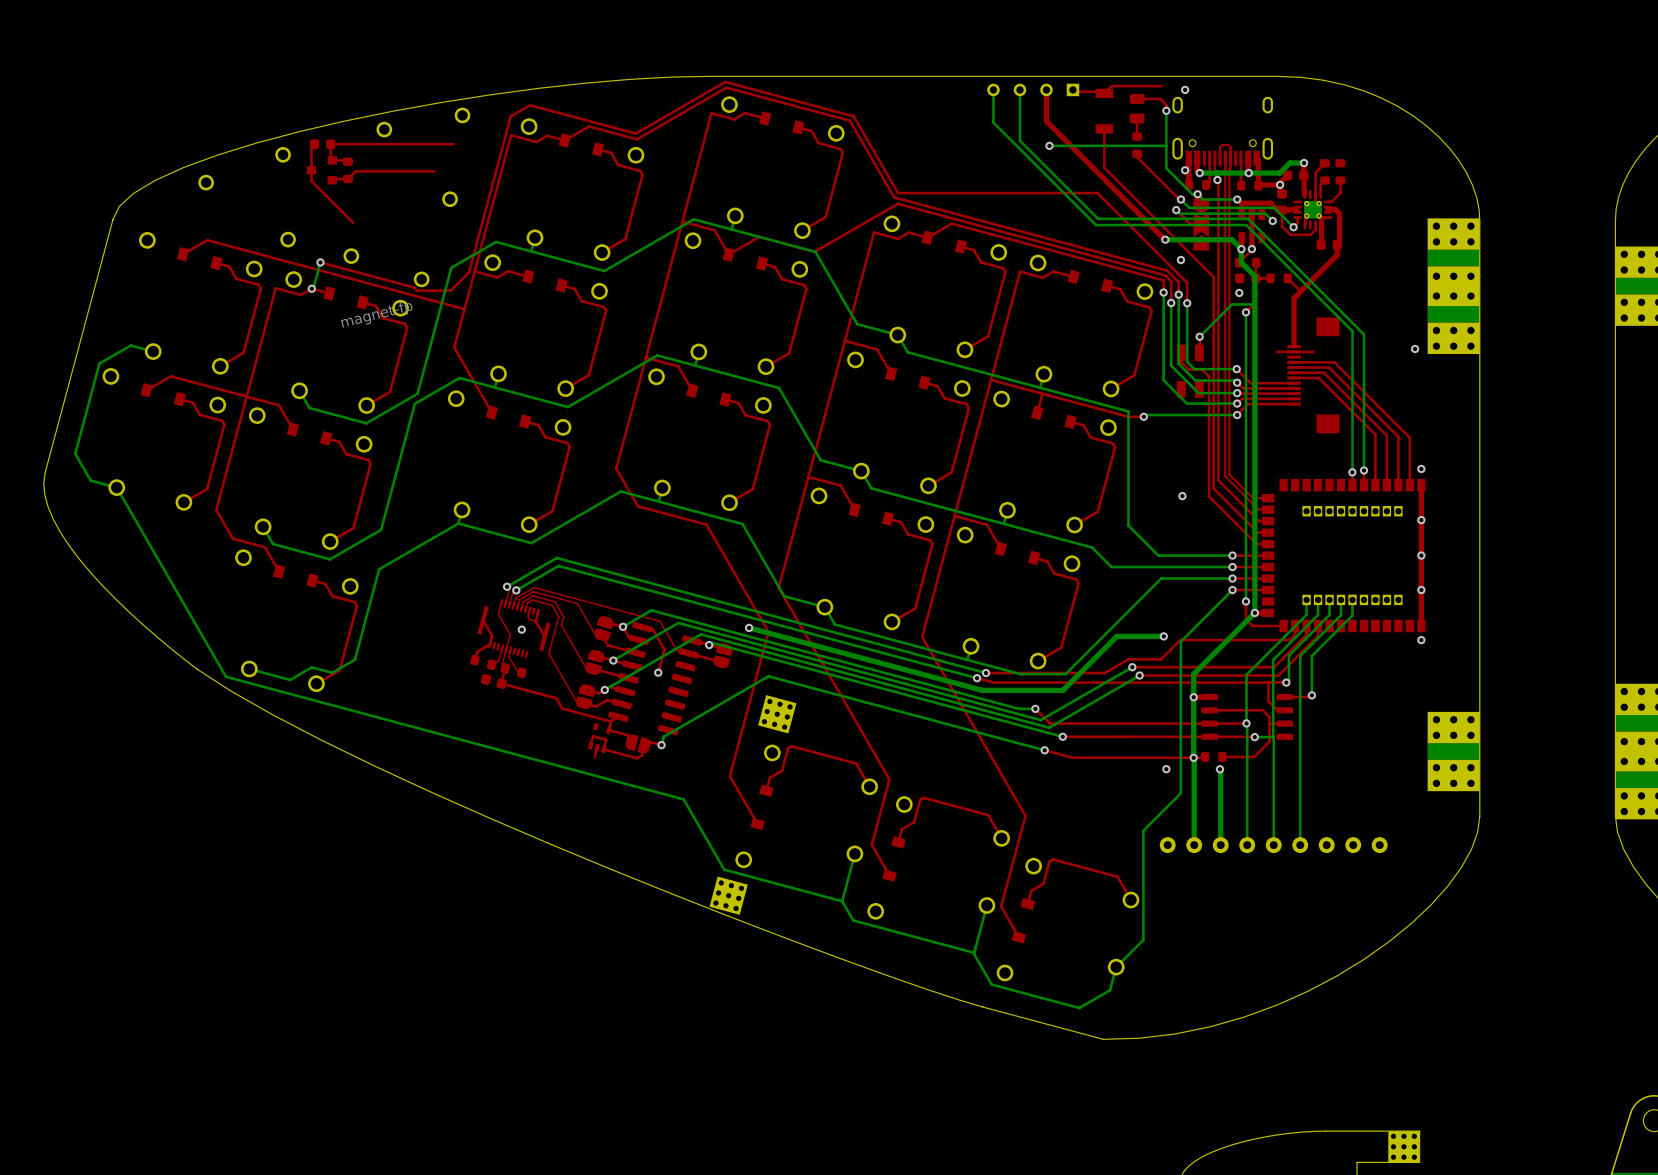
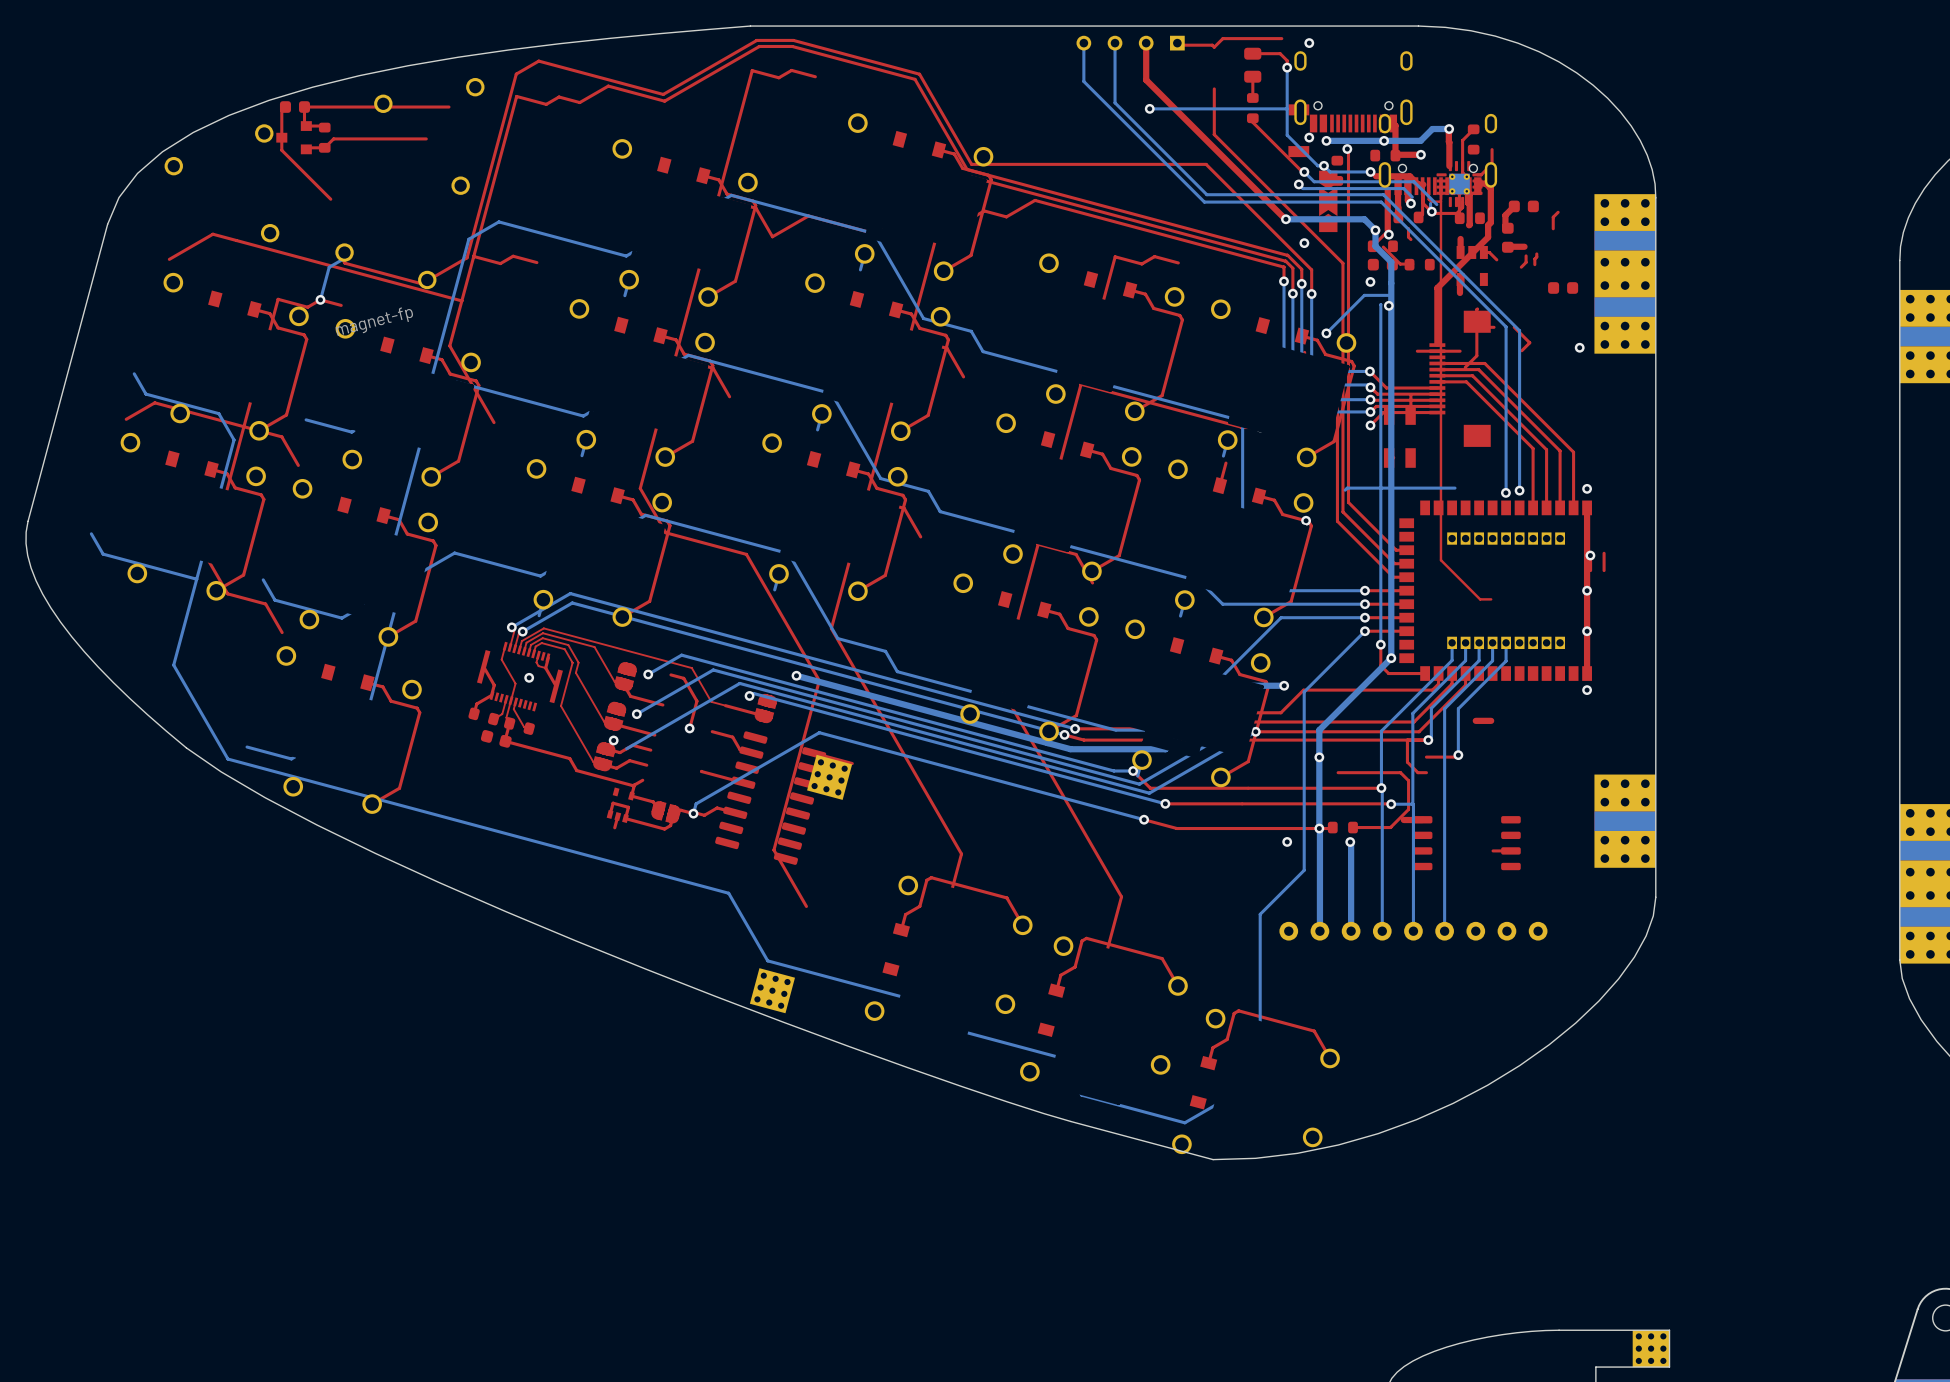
via: none -> (1309, 43)
top track: none -> (759, 46) (792, 46) (915, 79) (967, 169) (1287, 255) (1301, 269) (1301, 283)
top track: none -> (759, 46) (664, 101) (608, 86) (579, 102) (559, 97) (546, 104) (516, 96) (449, 345) (494, 422)
via: none -> (1287, 67)
top track: none -> (1214, 88) (1214, 134) (1342, 263) (1342, 511) (1394, 563) (1406, 563)
board edge: (1278, 76) (709, 76) (630, 79) (489, 94) (391, 111) (298, 131) (217, 154) (155, 180) (133, 193) (119, 206) (112, 219) (45, 472) (43, 483) (48, 506) (69, 545) (103, 586) (143, 624) (196, 668) (230, 690) (319, 739) (429, 791) (551, 844) (733, 918) (887, 975) (982, 1006) (1103, 1039) (1139, 1038) (1175, 1033) (1243, 1017) (1276, 1005) (1336, 976) (1364, 959) (1411, 923) (1431, 904) (1461, 867) (1471, 849) (1477, 832) (1479, 816) (1479, 221) (1476, 197) (1466, 172) (1449, 148) (1426, 125) (1397, 106) (1362, 90) (1343, 84) (1300, 77) (1278, 76) -> (1418, 26) (1445, 27) (1495, 36) (1517, 43) (1558, 61) (1593, 85) (1620, 111) (1640, 140) (1652, 169) (1655, 197) (1655, 897) (1653, 915) (1646, 935) (1634, 957) (1598, 1001) (1575, 1023) (1519, 1065) (1487, 1085) (1416, 1119) (1338, 1144) (1297, 1153) (1255, 1158) (1213, 1159) (1070, 1121) (1007, 1101) (847, 1046) (715, 996) (575, 940) (438, 882) (317, 825) (221, 771) (186, 747) (166, 731) (98, 667) (60, 622) (36, 580) (27, 555) (26, 543) (28, 521) (107, 224) (118, 197) (137, 173) (162, 151) (193, 132) (229, 115) (312, 87) (408, 65) (560, 43) (750, 26) (1418, 26)
part: none -> (1353, 91)
top track: (1161, 86) (1111, 86) (1104, 93) (1102, 91) (1073, 91) -> (1281, 38) (1222, 38) (1214, 47) (1212, 45) (1177, 45)
bottom track: (993, 89) (993, 122) (1095, 225) (1246, 225) (1352, 331) (1352, 472) -> (1083, 43) (1083, 81) (1204, 202) (1381, 202) (1506, 326) (1505, 492)
bottom track: (1019, 89) (1019, 140) (1098, 218) (1248, 218) (1363, 334) (1363, 470) -> (1115, 43) (1115, 102) (1206, 194) (1383, 194) (1519, 330) (1519, 490)
part position: (1033, 89) -> (1130, 43)
top track: (1046, 89) (1046, 121) (1165, 239) -> (1146, 43) (1146, 80) (1285, 219)
via: (1185, 89) -> none
part: none -> (1252, 108)
via: none -> (1149, 108)
top track: (1137, 98) (1160, 98) (1166, 104) (1166, 110) -> (1252, 53) (1280, 53) (1287, 60) (1287, 67)
part position: (1137, 108) -> (1252, 65)
via: none -> (1449, 129)
bottom track: (1166, 110) (1166, 168) (1192, 194) (1197, 194) (1202, 199) (1237, 199) -> (1287, 67) (1287, 135) (1317, 165) (1324, 165) (1330, 171) (1370, 171)
via: (1166, 110) -> none
via: none -> (1309, 137)
top track: (765, 118) (745, 113) (734, 119) (711, 113) (616, 468) (638, 506) (706, 524) (768, 632) (729, 776) (757, 824) -> (815, 76) (791, 70) (778, 77) (752, 70) (640, 488) (665, 532) (746, 554) (819, 680) (773, 850) (806, 906)
top track: (1137, 118) (1137, 136) -> (1252, 76) (1252, 97)
part: none -> (1473, 139)
via: none -> (1326, 140)
via: none -> (1384, 140)
via: none -> (1347, 149)
top track: (1104, 128) (1104, 167) -> none
via: none -> (1420, 154)
part: none -> (1385, 155)
via: none -> (1324, 165)
top track: (314, 144) (311, 147) (311, 181) (353, 222) -> (285, 107) (281, 110) (281, 150) (330, 199)
part position: (322, 144) -> (294, 107)
top track: (453, 144) (330, 144) (330, 158) (347, 161) -> (448, 107) (304, 107) (304, 124) (306, 126) (324, 127)
via: (1049, 145) -> none
bottom track: (1166, 145) (1049, 145) -> (1287, 108) (1149, 108)
via: none -> (1304, 171)
via: none -> (1370, 171)
top track: (1137, 153) (1137, 157) (1180, 199) -> (1252, 118) (1252, 122) (1304, 171)
via: none -> (1298, 184)
top track: (1220, 158) (1220, 147) (1222, 144) (1228, 144) (1230, 147) (1229, 173) -> none
top track: (1256, 158) (1258, 160) (1258, 185) (1280, 184) -> (1393, 123) (1395, 125) (1395, 155) (1420, 154)
top track: (1304, 162) (1304, 194) -> (1449, 129) (1449, 166)
bottom track: (1304, 162) (1289, 162) (1279, 173) (1199, 173) -> (1449, 129) (1432, 129) (1420, 140) (1326, 140)
via: (1304, 162) -> none
top track: (1324, 163) (1315, 172) (1315, 200) (1319, 203) -> (1473, 129) (1462, 140) (1462, 172) (1466, 176)
top track: (1104, 167) (1213, 277) (1213, 488) (1257, 532) (1267, 532) -> none
part position: (321, 170) -> (294, 137)
part position: (347, 170) -> (324, 137)
via: (1185, 170) -> none
top track: (434, 171) (355, 171) (347, 178) (332, 180) -> (426, 138) (333, 138) (324, 147) (306, 149)
part: none -> (1328, 201)
part: (1324, 171) -> none
part: (1340, 171) -> none
top track: (1229, 173) (1229, 474) (1253, 498) (1267, 498) -> none
via: (1248, 173) -> none
top track: (1217, 179) (1218, 480) (1259, 521) (1267, 521) -> (1347, 149) (1348, 502) (1396, 550) (1406, 550)
top track: (1340, 180) (1340, 192) (1331, 201) (1328, 201) -> (1492, 149) (1492, 164) (1481, 174) (1477, 174)
via: (1280, 184) -> none
via: none -> (1285, 219)
via: (1197, 194) -> none
via: none -> (1375, 230)
part position: (334, 197) -> (324, 183)
part footprint: [1193, 198, 1210, 251] -> [1404, 258, 1435, 271]
bottom track: (1180, 199) (1189, 207) (1274, 207) (1293, 227) -> (1304, 171) (1314, 181) (1414, 181) (1436, 204)
top track: (1237, 199) (1241, 203) (1270, 203) (1277, 210) (1282, 210) (1282, 226) (1290, 234) (1310, 234) (1315, 229) (1315, 225) -> (1370, 171) (1374, 176) (1409, 176) (1418, 184) (1423, 184) (1423, 203) (1433, 213) (1456, 213) (1462, 207) (1462, 201)
via: (1237, 199) -> none
via: none -> (1304, 243)
part: none -> (1382, 246)
part position: (1312, 209) -> (1459, 184)
top track: (1327, 209) (1335, 209) (1339, 213) (1339, 242) (1337, 244) (1337, 255) (1294, 298) (1294, 345) -> (1477, 183) (1485, 183) (1490, 188) (1490, 222) (1488, 225) (1488, 237) (1437, 288) (1437, 343)
bottom track: (1176, 210) (1179, 213) (1265, 213) (1272, 220) -> (1298, 184) (1302, 188) (1403, 188) (1412, 197)
via: (1176, 210) -> none
top track: (1251, 214) (1251, 249) (1239, 262) -> (1387, 189) (1387, 231) (1372, 246)
top track: (1328, 217) (1319, 215) (1321, 218) (1321, 244) -> (1477, 193) (1468, 193) (1466, 191) (1469, 194) (1469, 225)
top track: none -> (169, 259) (212, 234) (461, 300)
top track: none -> (342, 259) (344, 263) (421, 283) (467, 257) (516, 74) (538, 61) (663, 94) (756, 40) (793, 40) (919, 74) (971, 164) (1206, 164) (1311, 269) (1311, 293)
bottom track: none -> (342, 259) (329, 267) (320, 299) (322, 298)
via: (1272, 220) -> none
top track: (682, 221) (714, 230) (728, 254) (759, 236) (814, 251) (897, 203) (1165, 275) (1171, 281) (1171, 303) -> (718, 198) (756, 208) (772, 236) (808, 215) (873, 233) (971, 177) (1285, 261) (1292, 268) (1292, 293)
via: (1293, 227) -> none
via: none -> (1283, 281)
bottom track: (1165, 239) (1232, 239) (1241, 249) (1241, 262) (1254, 276) (1254, 612) (1193, 674) (1194, 845) -> (1286, 219) (1364, 219) (1375, 230) (1375, 246) (1391, 262) (1391, 658) (1319, 730) (1319, 931)
via: none -> (1301, 283)
via: none -> (1292, 293)
via: none -> (1311, 293)
via: (1241, 249) -> none
via: (1251, 249) -> none
top track: (183, 254) (207, 240) (464, 309) -> none
via: none -> (320, 299)
top track: (320, 262) (413, 287) (417, 290) (450, 290) (468, 272) (510, 116) (530, 105) (635, 133) (725, 81) (853, 116) (898, 193) (1097, 193) (1187, 282) (1187, 303) -> none
bottom track: (320, 262) (311, 288) -> none
via: (320, 262) -> none
part: (1247, 262) -> none
top track: (474, 271) (497, 277) (508, 271) (528, 276) -> (473, 256) (500, 263) (513, 256) (536, 262)
top track: (1073, 276) (1053, 271) (1042, 277) (1020, 271) (922, 637) (1025, 815) (1001, 906) (1018, 937) -> (1178, 262) (1154, 256) (1141, 263) (1115, 256) (1000, 686) (1121, 896) (1092, 1003) (1113, 1039)
part position: (1247, 278) -> (1382, 264)
part: (1279, 278) -> none
top track: (1163, 280) (951, 223) (927, 237) (908, 232) (897, 238) (873, 232) (778, 587) (889, 779) (871, 844) (889, 875) -> (1283, 267) (1035, 200) (1006, 216) (984, 210) (971, 218) (943, 210) (831, 628) (961, 854) (940, 931) (961, 967)
top track: (1163, 280) (1163, 292) -> (1283, 267) (1283, 281)
via: none -> (1326, 333)
part position: (1453, 286) -> (1625, 273)
via: (311, 288) -> none
bottom track: (1163, 292) (1163, 380) (1186, 403) (1237, 403) -> (1283, 281) (1283, 384) (1311, 411) (1370, 411)
via: (1163, 292) -> none
via: (1239, 292) -> none
top track: (329, 293) (311, 288) (300, 295) (275, 288) (216, 509) (232, 538) (265, 547) (279, 571) -> (341, 305) (320, 299) (307, 307) (278, 299) (208, 560) (227, 593) (265, 604) (282, 632)
top track: (1178, 294) (1178, 282) (1166, 270) (894, 197) (849, 120) (726, 87) (636, 139) (589, 126) (564, 140) (547, 135) (536, 142) (511, 135) (454, 347) (491, 412) -> none
bottom track: (1178, 294) (1178, 363) (1195, 380) (1235, 380) (1237, 382) -> (1301, 283) (1301, 365) (1321, 384) (1368, 384) (1370, 387)
via: (1178, 294) -> none
bottom track: (1254, 294) (1254, 304) (1232, 304) (1199, 336) -> (1391, 283) (1391, 295) (1364, 295) (1326, 333)
via: none -> (1579, 347)
bottom track: (1171, 303) (1171, 365) (1198, 393) (1237, 393) -> (1292, 293) (1292, 367) (1325, 399) (1370, 399)
via: (1171, 303) -> none
bottom track: (1187, 303) (1187, 361) (1194, 369) (1236, 369) -> (1311, 293) (1311, 362) (1320, 371) (1369, 371)
via: (1187, 303) -> none
bottom track: (1245, 312) (1245, 601) -> (1380, 304) (1380, 644)
via: (1245, 312) -> none
via: none -> (1369, 371)
bottom track: none -> (134, 373) (145, 394) (218, 413) (234, 439) (173, 665) (227, 759) (728, 893) (767, 960) (905, 997)
via: none -> (1370, 387)
via: (1199, 336) -> none
via: none -> (1370, 399)
top track: (844, 340) (877, 349) (891, 373) -> (909, 338) (947, 348) (963, 376)
via: (1415, 348) -> none
via: none -> (1370, 411)
bottom track: (153, 351) (130, 345) (99, 363) (75, 453) (90, 480) (116, 487) (225, 676) (683, 799) (724, 869) (842, 901) -> none
top track: (1313, 351) (1277, 351) -> (1460, 351) (1417, 351)
top track: (1181, 352) (1181, 362) (1188, 369) (1202, 369) (1209, 376) (1209, 496) (1256, 544) (1267, 544) -> (1304, 352) (1304, 363) (1313, 372) (1329, 372) (1337, 380) (1337, 521) (1393, 577) (1406, 577)
bottom track: none -> (306, 419) (351, 432) (380, 415) (409, 423) (421, 417) (468, 239) (498, 221) (626, 256) (731, 195) (874, 233) (923, 318) (971, 331) (983, 351) (1242, 421) (1242, 555) (1277, 590) (1364, 590)
top track: (645, 357) (678, 366) (692, 390) -> (675, 358) (713, 368) (729, 396)
via: none -> (1370, 425)
top track: (1294, 362) (1334, 362) (1409, 437) (1409, 485) -> (1437, 363) (1484, 363) (1573, 452) (1573, 507)
top track: (1294, 367) (1329, 367) (1398, 436) (1398, 485) -> (1437, 369) (1478, 369) (1560, 450) (1560, 507)
top track: (1236, 369) (1250, 383) (1294, 383) -> (1369, 371) (1386, 388) (1437, 388)
via: (1236, 369) -> none
top track: (1294, 372) (1323, 372) (1386, 435) (1386, 485) -> (1437, 375) (1472, 375) (1546, 449) (1546, 507)
part position: (1313, 375) -> (1460, 378)
top track: (1294, 378) (1318, 378) (1375, 434) (1375, 485) -> (1437, 381) (1466, 381) (1533, 448) (1533, 507)
top track: (991, 380) (1127, 416) (1143, 416) -> (1081, 384) (1241, 427) (1260, 427)
top track: (1237, 382) (1243, 388) (1294, 388) -> (1370, 387) (1377, 394) (1437, 394)
via: (1237, 382) -> none
top track: (146, 390) (170, 376) (278, 405) (292, 429) -> (126, 419) (154, 402) (281, 436) (298, 465)
bottom track: (299, 390) (309, 408) (366, 423) (417, 393) (451, 267) (496, 241) (604, 271) (693, 219) (815, 251) (857, 324) (897, 335) (907, 352) (1128, 411) (1128, 525) (1158, 555) (1232, 555) -> none
top track: (1237, 393) (1294, 393) -> (1370, 399) (1437, 400)
via: (1237, 393) -> none
top track: (1294, 398) (1242, 398) (1237, 403) -> (1437, 406) (1376, 406) (1370, 411)
via: (1237, 403) -> none
top track: (1294, 404) (1248, 404) (1237, 415) -> (1437, 412) (1383, 412) (1370, 425)
via: (1237, 415) -> none
via: none -> (1587, 488)
via: (1143, 416) -> none
via: none -> (1519, 490)
via: none -> (1505, 492)
via: none -> (1306, 520)
bottom track: none -> (91, 533) (103, 554) (196, 579)
via: (1421, 468) -> none
via: (1363, 470) -> none
top track: (808, 476) (840, 485) (854, 509) -> (866, 498) (904, 508) (920, 536)
top track: (1421, 485) (1421, 626) -> (1587, 507) (1587, 673)
bottom track: none -> (263, 579) (274, 600) (341, 618) (379, 596) (433, 394) (456, 381) (583, 416) (688, 355) (831, 393) (880, 478) (928, 491) (940, 511) (1199, 581) (1222, 604) (1364, 604)
via: (1182, 496) -> none
via: none -> (1364, 590)
via: none -> (1587, 590)
via: none -> (1364, 604)
top track: (954, 516) (986, 524) (1000, 548) -> (1038, 544) (1076, 554) (1092, 582)
via: (1421, 520) -> none
bottom track: none -> (1364, 617) (1281, 617) (1168, 730) (1116, 730) (897, 671) (885, 651) (837, 638) (788, 553) (645, 515) (540, 576) (454, 553) (402, 583) (358, 745) (347, 751) (317, 743) (291, 758) (247, 747)
via: none -> (1364, 617)
bottom track: (263, 526) (273, 544) (330, 559) (381, 529) (414, 403) (459, 378) (567, 407) (657, 355) (779, 388) (820, 460) (861, 471) (871, 488) (1092, 547) (1111, 567) (1232, 567) -> none
via: none -> (511, 627)
via: none -> (1364, 631)
via: none -> (1587, 631)
via: none -> (522, 631)
via: none -> (1380, 644)
top track: none -> (505, 646) (501, 659) (515, 683) (506, 717) (509, 723) (505, 741) (569, 758) (576, 770) (634, 785)
via: (1232, 555) -> none
top track: (1267, 555) (1232, 555) -> (1406, 590) (1364, 590)
part position: (1343, 555) -> (1495, 590)
via: (1421, 555) -> none
via: none -> (1391, 658)
top track: none -> (483, 666) (494, 685) (491, 695) (476, 703) (473, 717)
via: (1232, 567) -> none
top track: (1267, 567) (1232, 567) -> (1406, 604) (1364, 604)
via: none -> (648, 674)
via: none -> (796, 675)
part: none -> (625, 676)
via: none -> (529, 677)
bottom track: (1232, 578) (1161, 578) (1065, 674) (1020, 674) -> none
via: (1232, 578) -> none
top track: (1267, 578) (1232, 578) -> (1406, 617) (1364, 617)
via: none -> (1284, 685)
top track: (507, 586) (509, 590) (505, 603) -> (511, 627) (514, 631) (509, 647)
bottom track: (507, 586) (556, 558) (986, 673) -> (511, 627) (570, 593) (1075, 728)
via: (507, 586) -> none
via: none -> (1587, 690)
top track: (516, 590) (512, 592) (509, 604) -> (522, 631) (518, 633) (514, 648)
bottom track: (516, 590) (558, 566) (977, 678) -> (522, 631) (572, 602) (1064, 734)
via: (516, 590) -> none
bottom track: (1232, 590) (1180, 641) (1180, 793) (1143, 830) (1143, 939) (1116, 967) (1110, 990) (1079, 1008) (991, 984) (973, 953) (986, 905) -> (1364, 631) (1304, 691) (1304, 870) (1260, 914) (1260, 1042) (1228, 1074) (1220, 1101) (1184, 1122) (1081, 1095) (1060, 1059) (1076, 1002)
via: (1232, 590) -> none
top track: (1267, 590) (1232, 590) -> (1406, 631) (1364, 631)
via: (1421, 590) -> none
via: none -> (749, 695)
bottom track: (1306, 599) (1306, 614) (1246, 674) (1247, 845) -> (1452, 642) (1452, 660) (1381, 731) (1382, 931)
bottom track: (1318, 599) (1318, 615) (1273, 659) (1273, 737) -> (1465, 642) (1465, 660) (1412, 713) (1412, 804)
bottom track: (1329, 599) (1329, 615) (1288, 655) (1288, 679) (1286, 682) -> (1479, 642) (1479, 660) (1431, 708) (1431, 737) (1428, 740)
bottom track: (1341, 599) (1341, 615) (1300, 655) (1300, 845) -> (1492, 642) (1492, 660) (1444, 708) (1444, 931)
bottom track: (1352, 599) (1352, 615) (1311, 655) (1311, 695) -> (1506, 642) (1506, 661) (1458, 708) (1458, 755)
top track: (1245, 601) (1245, 619) (1252, 626) (1283, 626) -> (1380, 644) (1380, 665) (1388, 673) (1425, 673)
via: (1245, 601) -> none
top track: (501, 602) (498, 614) (510, 634) (502, 663) (505, 668) (501, 683) (556, 698) (562, 708) (610, 721) (618, 716) -> none
part: none -> (765, 708)
top track: (513, 606) (515, 598) (534, 587) (660, 621) (676, 650) (721, 662) -> (519, 650) (521, 641) (543, 628) (691, 668) (711, 701) (763, 716)
top track: (517, 607) (519, 599) (533, 591) (577, 603) (594, 633) (602, 635) (608, 645) (635, 652) -> (524, 651) (526, 642) (542, 633) (594, 647) (614, 682) (623, 684) (630, 696) (662, 705)
via: none -> (636, 714)
top track: (521, 608) (523, 601) (533, 595) (555, 601) (563, 616) (561, 625) (585, 666) (628, 678) -> (528, 652) (531, 644) (542, 638) (568, 645) (578, 662) (575, 672) (604, 721) (654, 735)
part: none -> (483, 716)
part: none -> (615, 716)
top track: (525, 609) (527, 603) (532, 600) (552, 605) (558, 616) (548, 653) (576, 701) (596, 706) (607, 700) (621, 703) -> (533, 653) (535, 646) (541, 643) (564, 649) (572, 662) (561, 706) (593, 762) (616, 768) (629, 760) (646, 765)
top track: (529, 610) (528, 616) (529, 619) (535, 621) -> (538, 655) (536, 662) (538, 666) (545, 668)
top track: (538, 612) (535, 621) -> (548, 657) (545, 668)
via: (1254, 612) -> none
part: none -> (519, 726)
via: none -> (689, 728)
via: none -> (1075, 728)
top track: (483, 620) (492, 635) (489, 644) -> none
top track: (535, 621) (544, 636) -> (545, 668) (556, 686)
via: none -> (1255, 731)
top track: none -> (1064, 734) (1084, 740) (1428, 740)
via: none -> (1064, 734)
bottom track: (623, 626) (651, 610) (1019, 708) (1035, 708) -> (648, 674) (681, 655) (1113, 770) (1133, 770)
via: (623, 626) -> none
top track: (1295, 626) (1295, 634) (1289, 640) (1180, 640) (1161, 659) (1128, 659) (1104, 672) -> (1438, 673) (1438, 683) (1432, 690) (1303, 690) (1280, 712) (1242, 712) (1214, 728)
top track: (1306, 626) (1306, 634) (1274, 667) (1132, 667) -> (1452, 673) (1452, 683) (1414, 722) (1247, 722)
top track: (1318, 626) (1318, 635) (1278, 675) (1139, 675) -> (1465, 673) (1465, 685) (1419, 731) (1255, 731)
top track: (642, 627) (653, 630) (664, 649) (658, 672) -> (670, 674) (683, 678) (696, 701) (689, 728)
bottom track: (749, 627) (981, 690) -> (796, 675) (1070, 749)
via: (749, 627) -> none
part position: (513, 628) -> (519, 676)
part: (603, 628) -> none
via: none -> (1428, 740)
top track: none -> (606, 748) (619, 752) (632, 745) (650, 750)
bottom track: (1163, 636) (1116, 636) (1062, 690) (981, 690) -> (1284, 685) (1229, 685) (1165, 749) (1070, 749)
via: (1163, 636) -> none
via: (1421, 640) -> none
via: none -> (1458, 755)
part: none -> (604, 756)
via: none -> (1319, 757)
top track: (489, 644) (477, 651) (474, 663) -> none
bottom track: (709, 645) (712, 643) (1062, 736) -> (749, 695) (753, 693) (1165, 803)
via: (709, 645) -> none
top track: (502, 647) (498, 660) (491, 664) -> (506, 699) (502, 714) (493, 719)
top track: (510, 650) (508, 656) (517, 671) (521, 672) -> (515, 701) (513, 709) (524, 727) (529, 728)
part: (723, 655) -> none
via: none -> (1133, 770)
bottom track: (613, 660) (678, 622) (1040, 720) (1132, 667) -> (636, 714) (713, 669) (1139, 784) (1247, 722)
via: (613, 660) -> none
part: none -> (829, 777)
part: (483, 662) -> none
part: (594, 662) -> none
top track: none -> (642, 780) (634, 785)
via: (1132, 667) -> none
bottom track: (249, 668) (290, 679) (311, 667) (332, 672) (354, 659) (379, 569) (458, 523) (531, 543) (620, 491) (742, 524) (784, 596) (824, 607) (834, 624) (1020, 674) -> none
part: (513, 670) -> none
via: none -> (1381, 788)
via: (658, 672) -> none
via: (986, 673) -> none
top track: (1104, 673) (986, 673) -> (1214, 728) (1075, 728)
bottom track: (1139, 675) (1049, 727) (700, 634) (604, 689) -> (1255, 731) (1149, 793) (739, 683) (626, 748)
via: (1139, 675) -> none
top track: (977, 678) (993, 682) -> none
via: (977, 678) -> none
part position: (493, 681) -> (496, 738)
top track: (1268, 682) (1268, 701) (1277, 710) (1284, 710) -> (1407, 740) (1407, 762) (1417, 772) (1426, 772)
top track: (1286, 682) (993, 682) -> none
via: (1286, 682) -> none
via: none -> (1165, 803)
via: none -> (1391, 804)
via position: (604, 689) -> (693, 813)
part: none -> (665, 812)
top track: (1311, 695) (1310, 697) (1284, 697) -> (1458, 755) (1456, 757) (1426, 757)
via: (1311, 695) -> none
part: (585, 696) -> none
via: none -> (1144, 819)
via: (1193, 697) -> none
via: none -> (1319, 828)
top track: (1035, 708) (1050, 723) (1246, 723) -> (1133, 770) (1150, 788) (1381, 788)
via: (1035, 708) -> none
top track: (1209, 710) (1262, 710) (1269, 717) (1269, 741) (1254, 756) -> (1338, 772) (1400, 772) (1408, 780) (1408, 809) (1390, 827)
part: (777, 714) -> none
via: none -> (1287, 841)
via: none -> (1350, 842)
top track: (611, 720) (608, 730) (627, 735) (631, 742) -> (634, 785) (631, 796) (653, 801) (658, 810)
via: (1246, 723) -> none
top track: (1062, 736) (1254, 737) -> (1165, 803) (1391, 804)
via: (1062, 736) -> none
via: (1254, 737) -> none
bottom track: (1273, 737) (1254, 737) -> (1412, 804) (1391, 804)
bottom track: (1273, 737) (1273, 845) -> (1412, 804) (1413, 931)
part position: (599, 738) -> (620, 805)
part: (638, 743) -> none
top track: (661, 745) (650, 742) (644, 745) (642, 755) (636, 758) (603, 749) (606, 739) (593, 736) (590, 745) -> (693, 813) (680, 810) (673, 814) (670, 825) (664, 829) (625, 818) (628, 807) (613, 803) (610, 814)
bottom track: (661, 745) (663, 736) (768, 676) (1044, 750) -> (693, 813) (696, 803) (819, 732) (1144, 819)
via: (661, 745) -> none
top track: (597, 747) (594, 757) -> (617, 816) (614, 827)
top track: (1044, 750) (1072, 757) (1205, 756) -> (1144, 819) (1176, 828) (1332, 827)
via: (1044, 750) -> none
part position: (1453, 751) -> (1625, 821)
part position: (1213, 756) -> (1342, 827)
top track: (1254, 756) (1222, 756) -> (1390, 827) (1353, 827)
via: (1193, 757) -> none
via: (1166, 769) -> none
bottom track: (1219, 769) (1220, 845) -> (1350, 842) (1351, 931)
via: (1219, 769) -> none
part: none -> (772, 990)
part position: (1273, 845) -> (1413, 931)
bottom track: (854, 853) (842, 901) -> (920, 941) (905, 997)
part: (728, 895) -> none
bottom track: (842, 901) (853, 920) (974, 952) -> (905, 997) (919, 1019) (1061, 1057)

